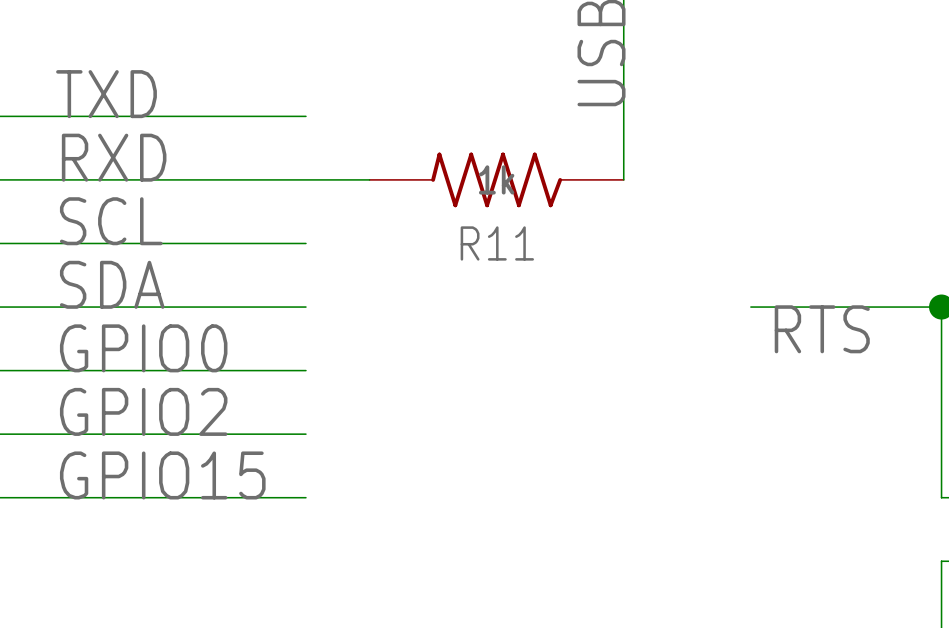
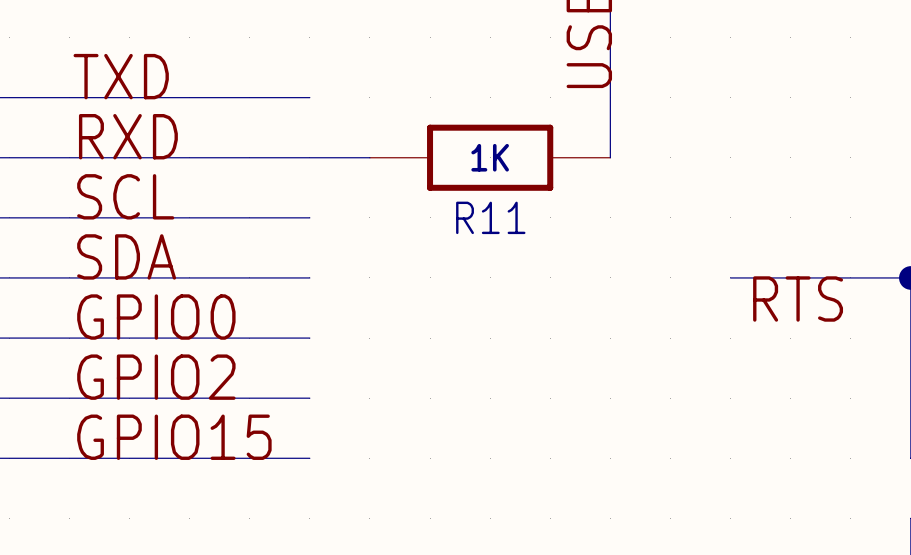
R11 symbol: [369, 152, 624, 208] -> [369, 124, 611, 191]
R11 value: 1k (496, 179) -> 1K (490, 157)

